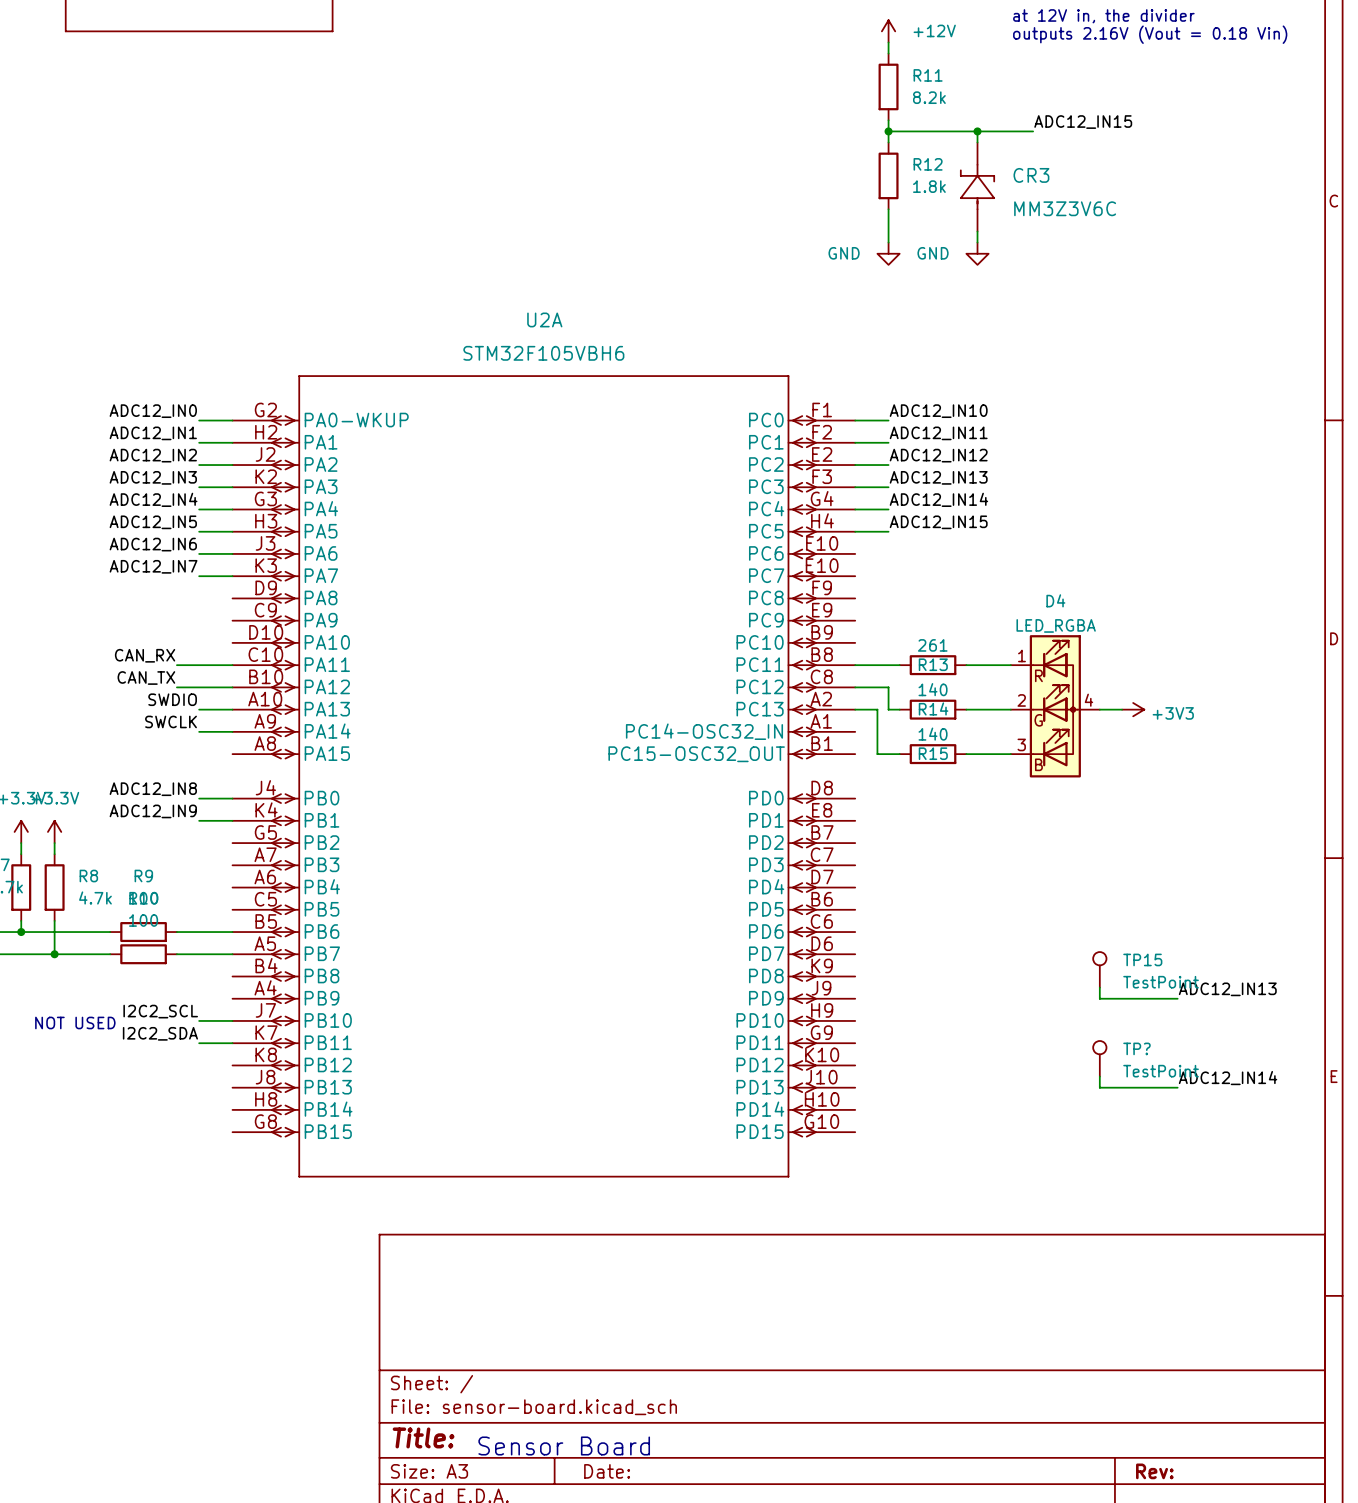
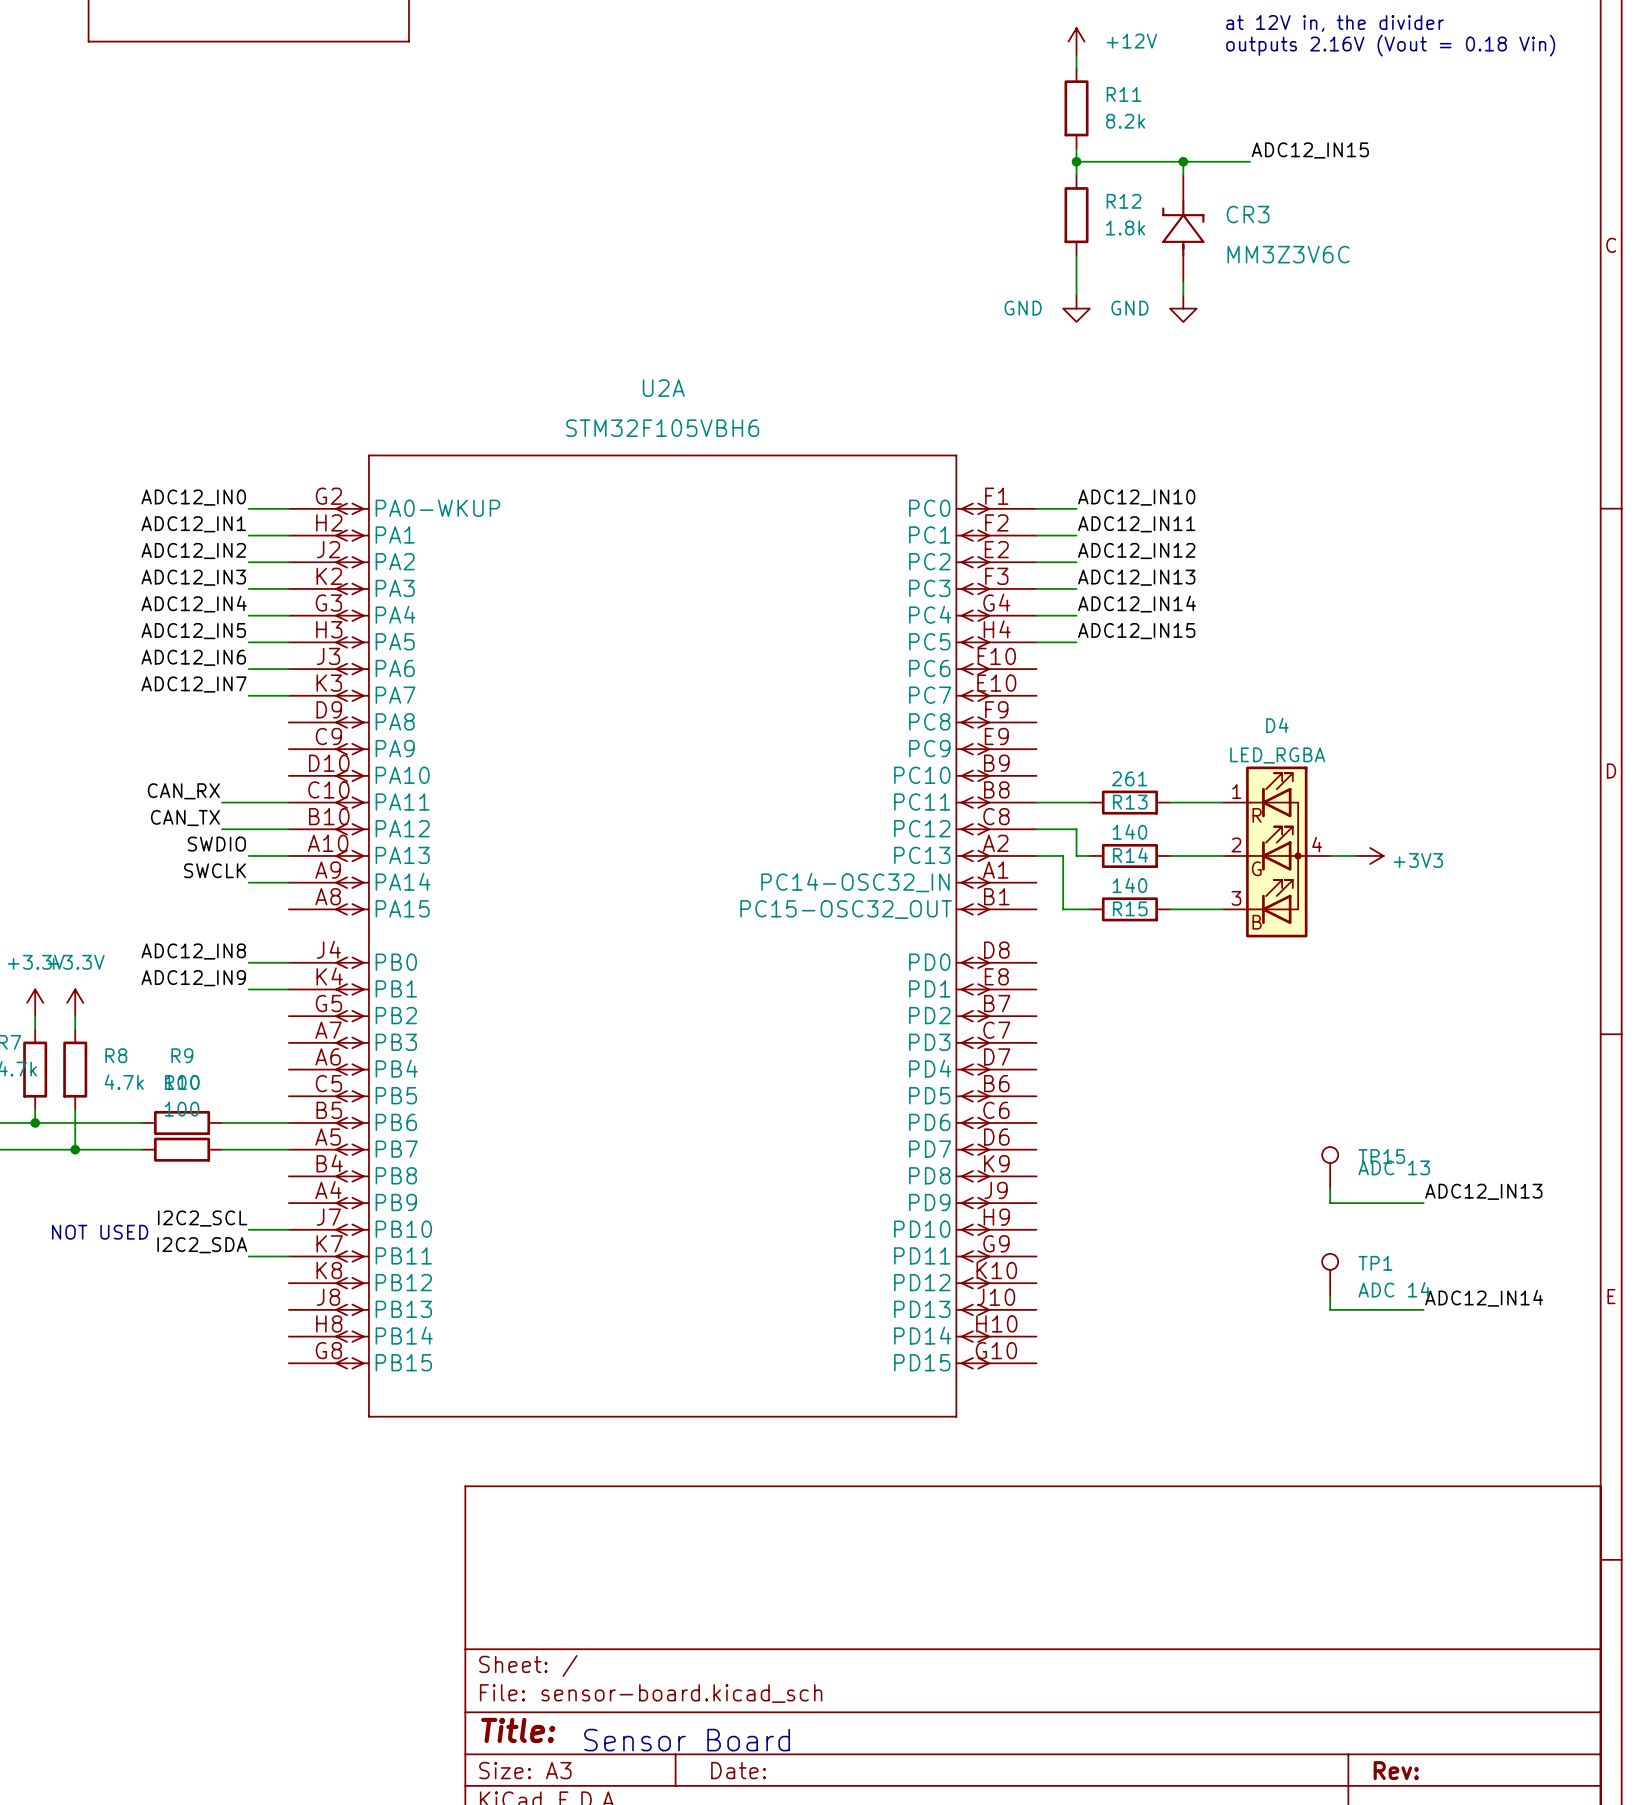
TP15 value: TestPoint (1161, 982) -> ADC 13 (1394, 1167)
TP? name: TP? (1136, 1048) -> TP1 (1375, 1263)
TP? value: TestPoint (1161, 1071) -> ADC 14 (1394, 1289)

